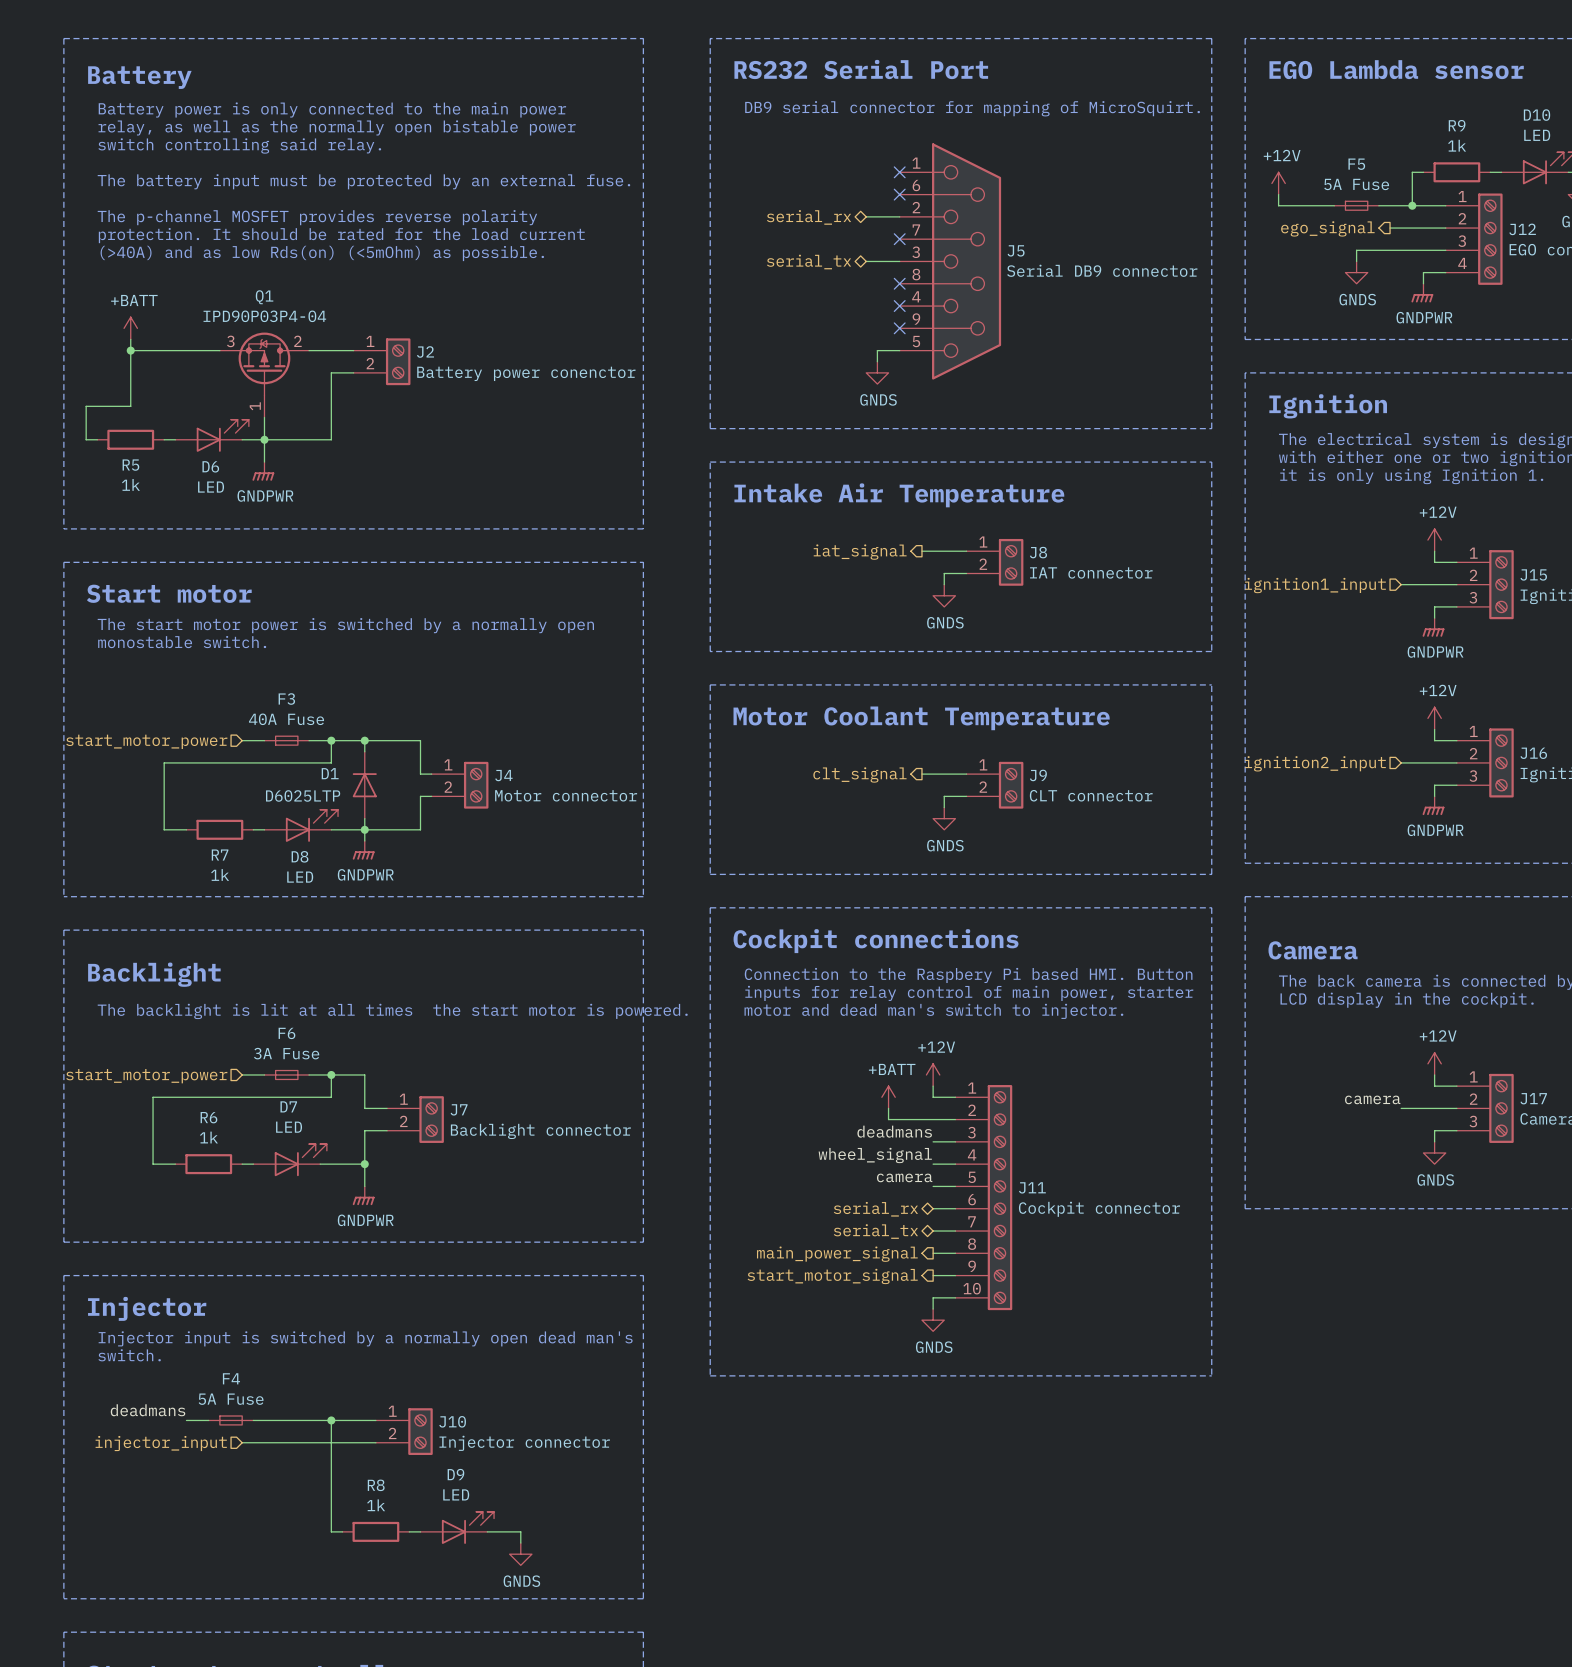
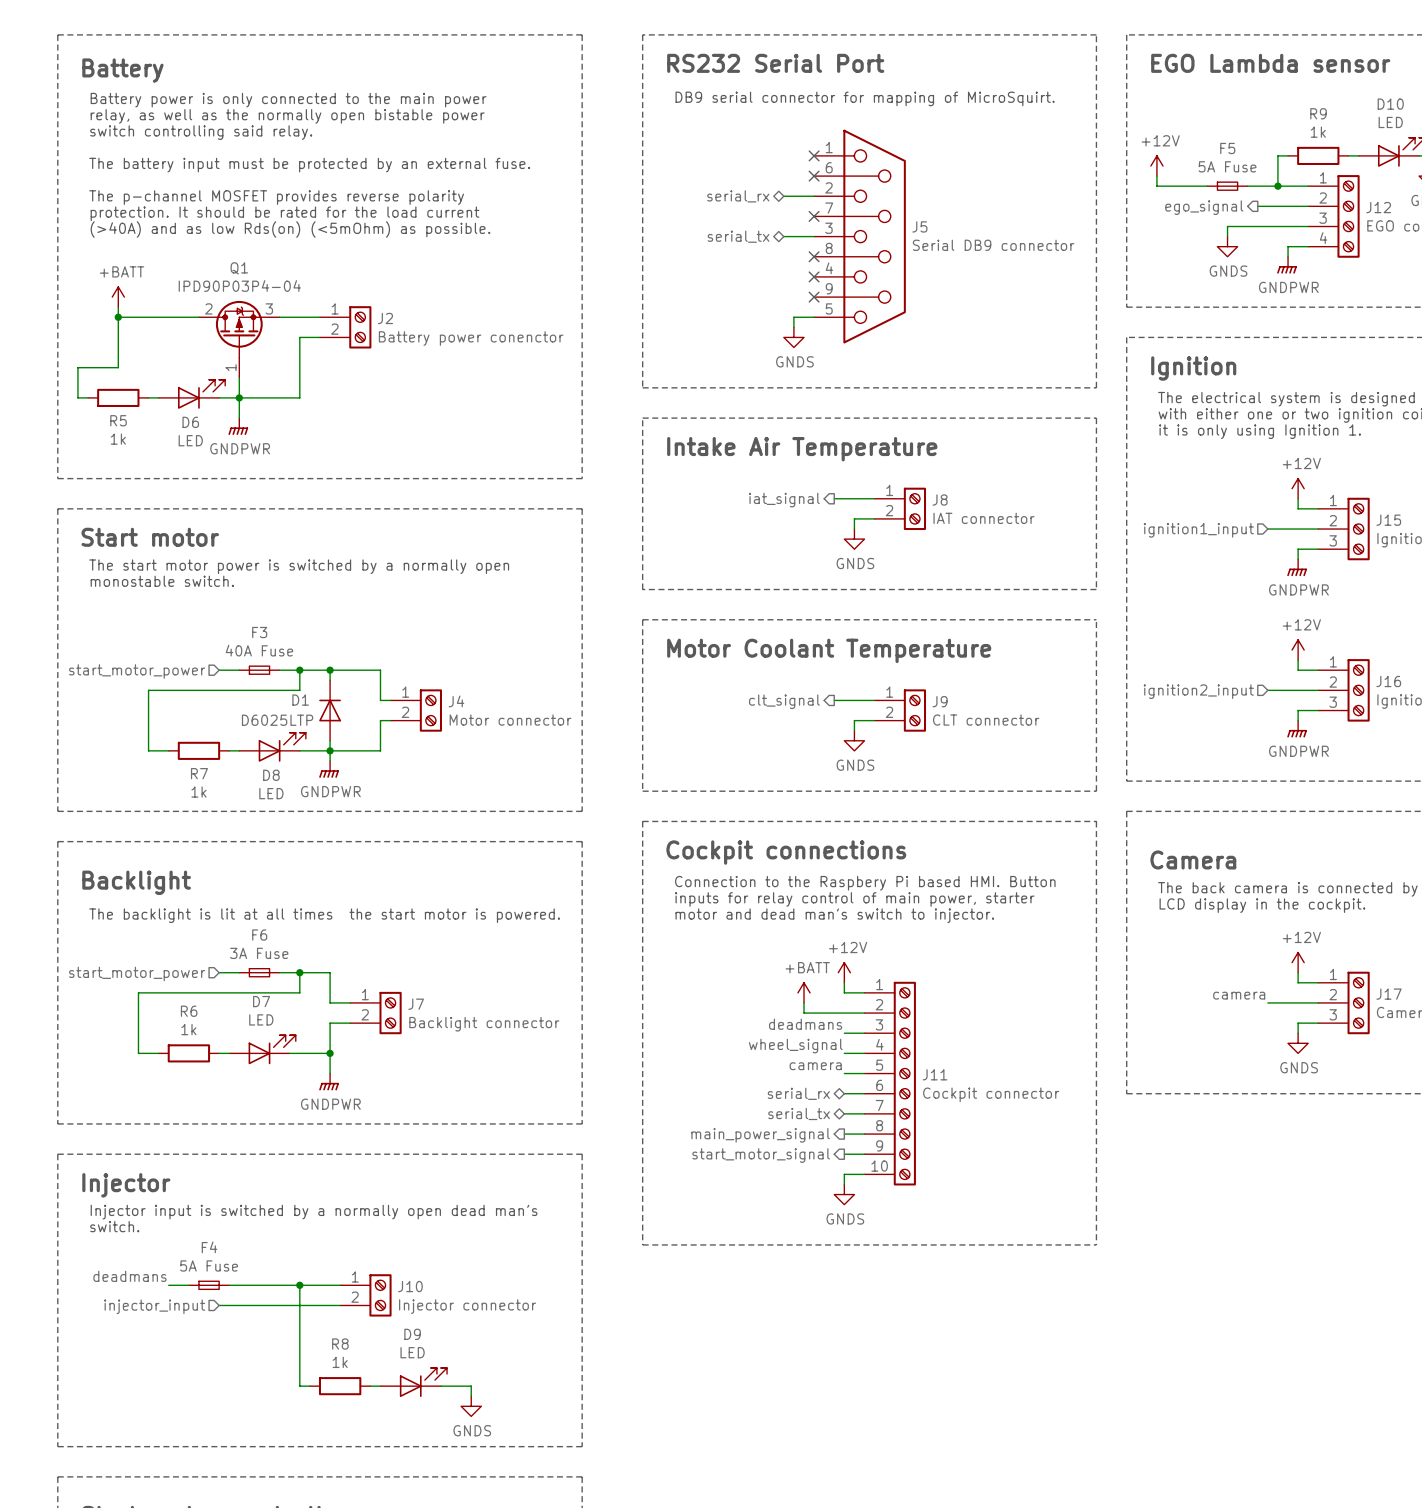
Q1 flip: as is (264, 363) -> left-right (239, 329)

